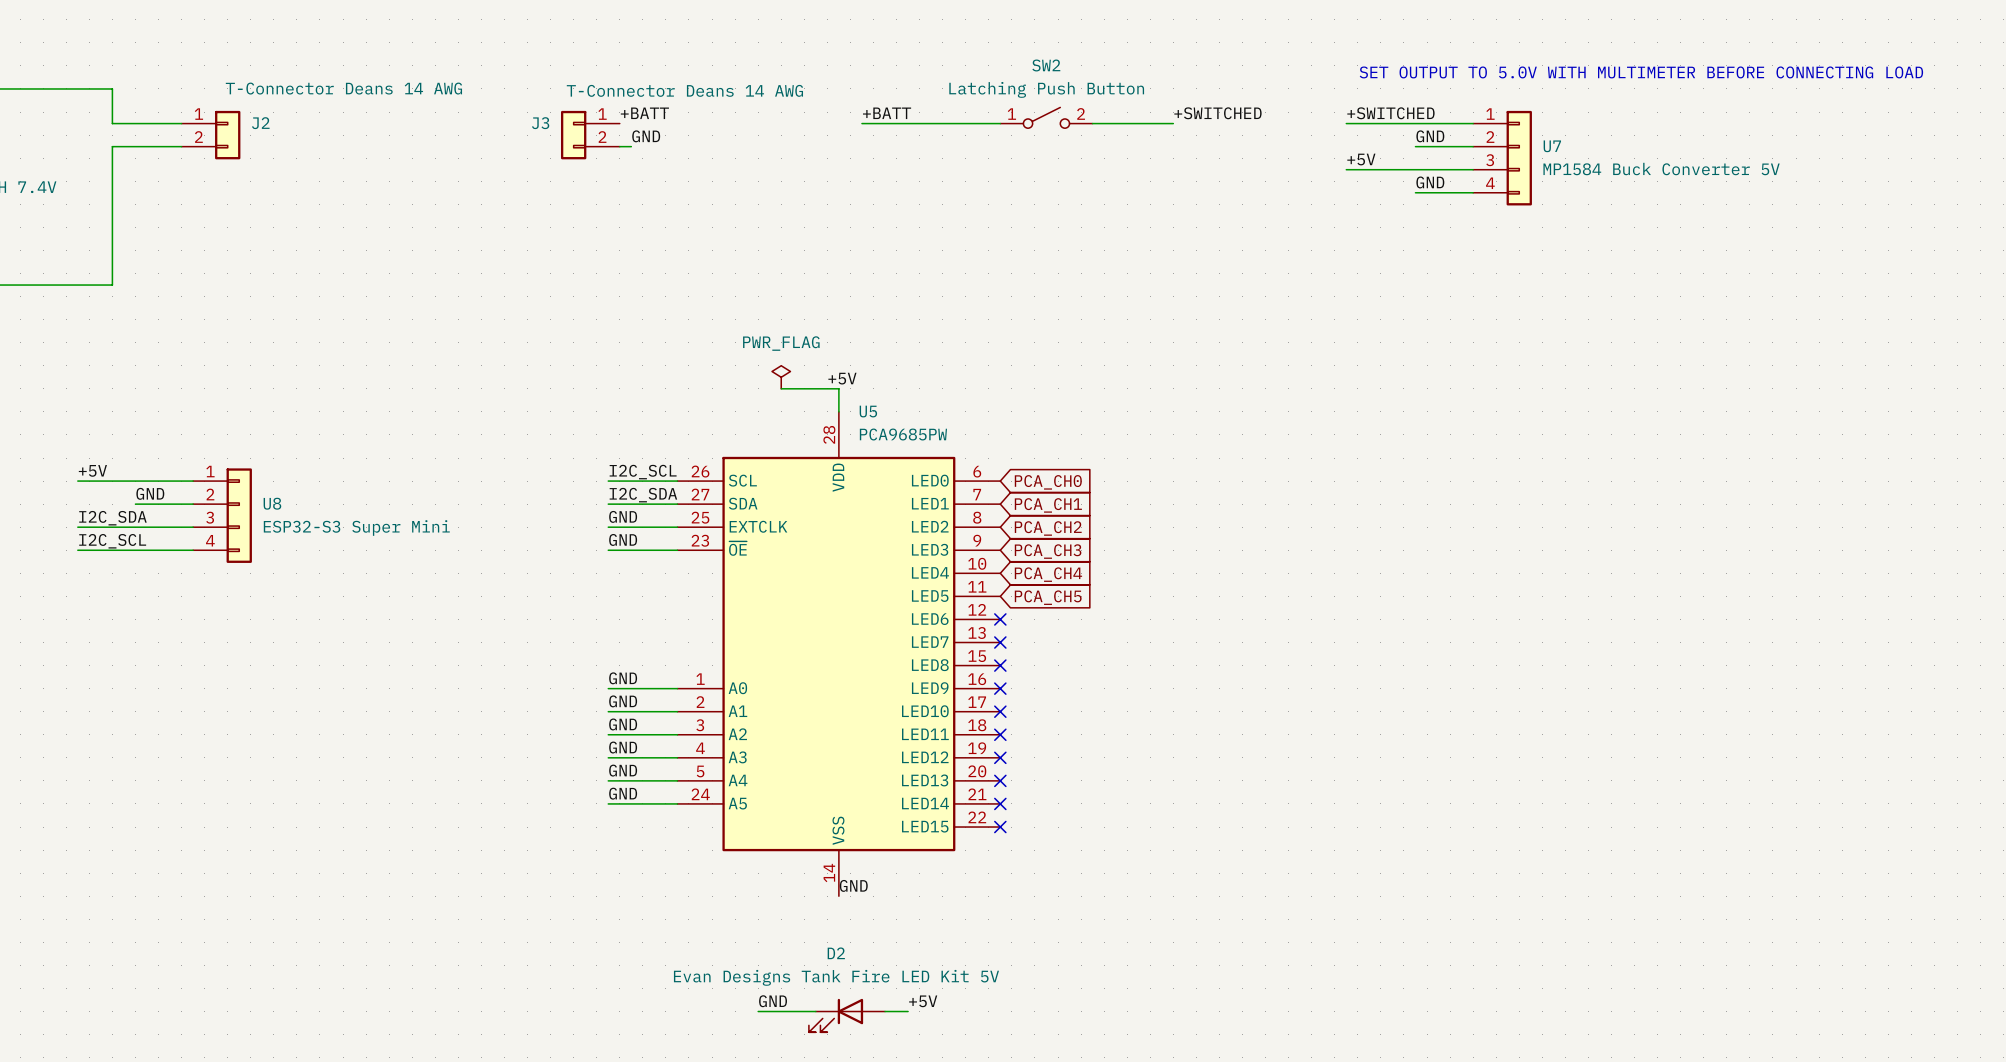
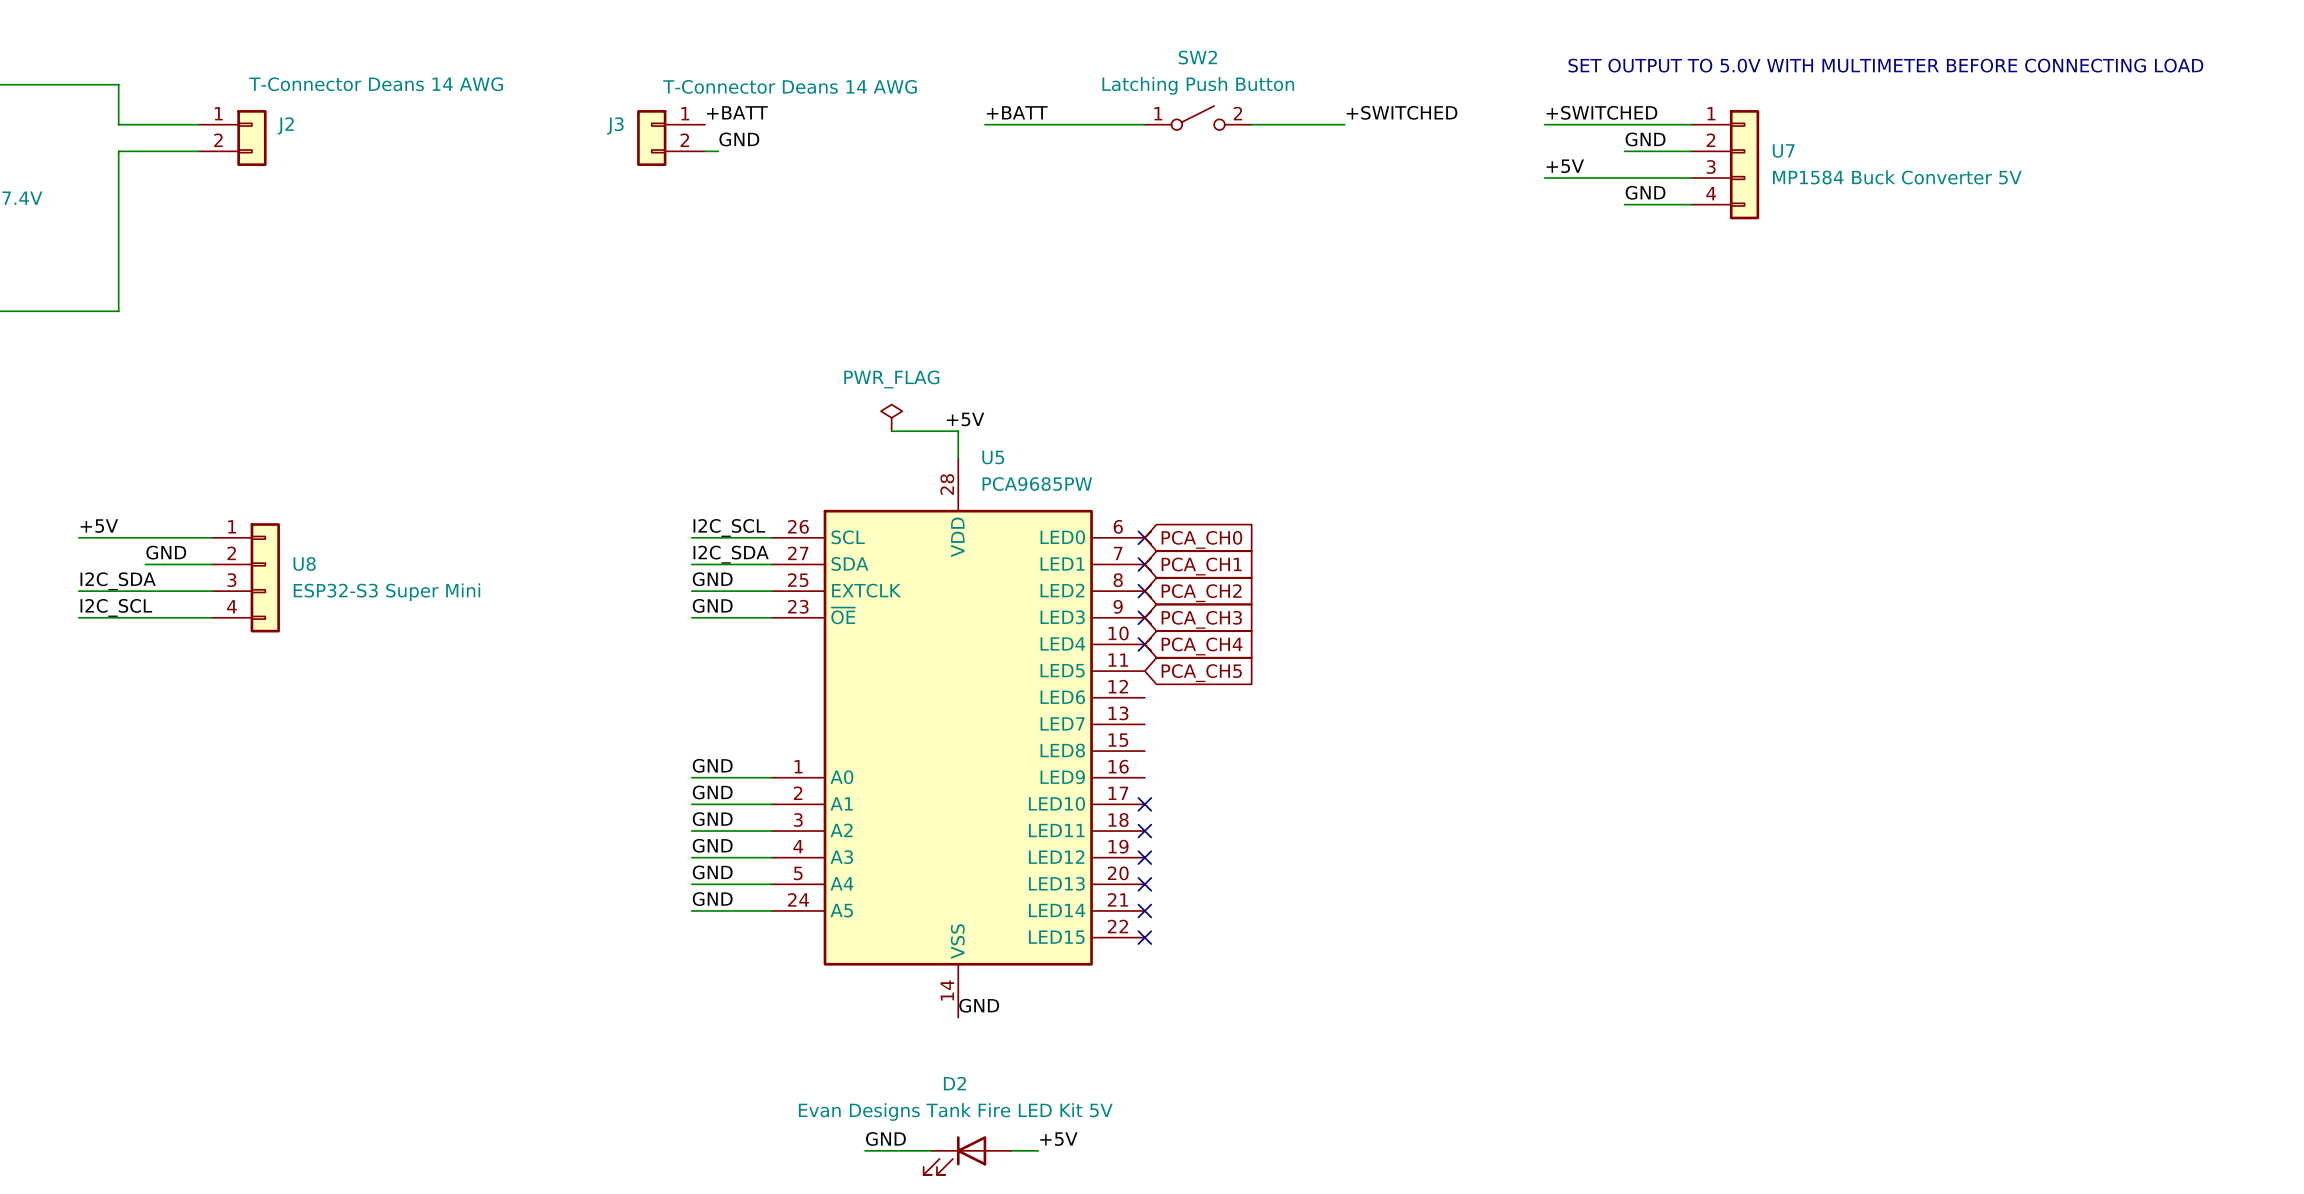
no-connect mark: none -> (1144, 537)
no-connect mark: none -> (1144, 564)
no-connect mark: none -> (1144, 591)
no-connect mark: none -> (1144, 617)
no-connect mark: none -> (1144, 644)
no-connect mark: (1000, 619) -> none
no-connect mark: (1000, 642) -> none
no-connect mark: (1000, 665) -> none
no-connect mark: (1000, 688) -> none

